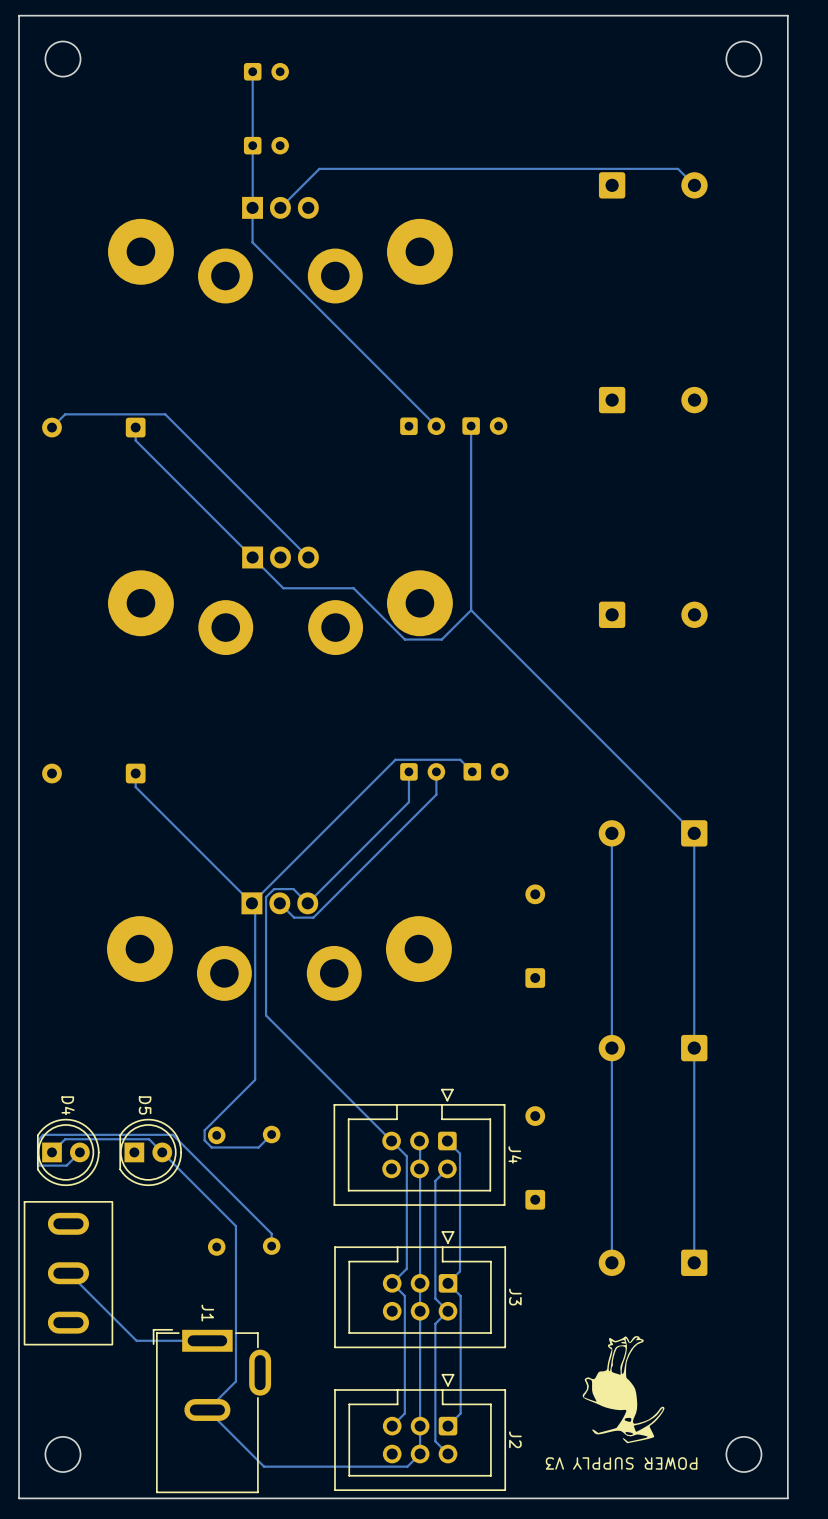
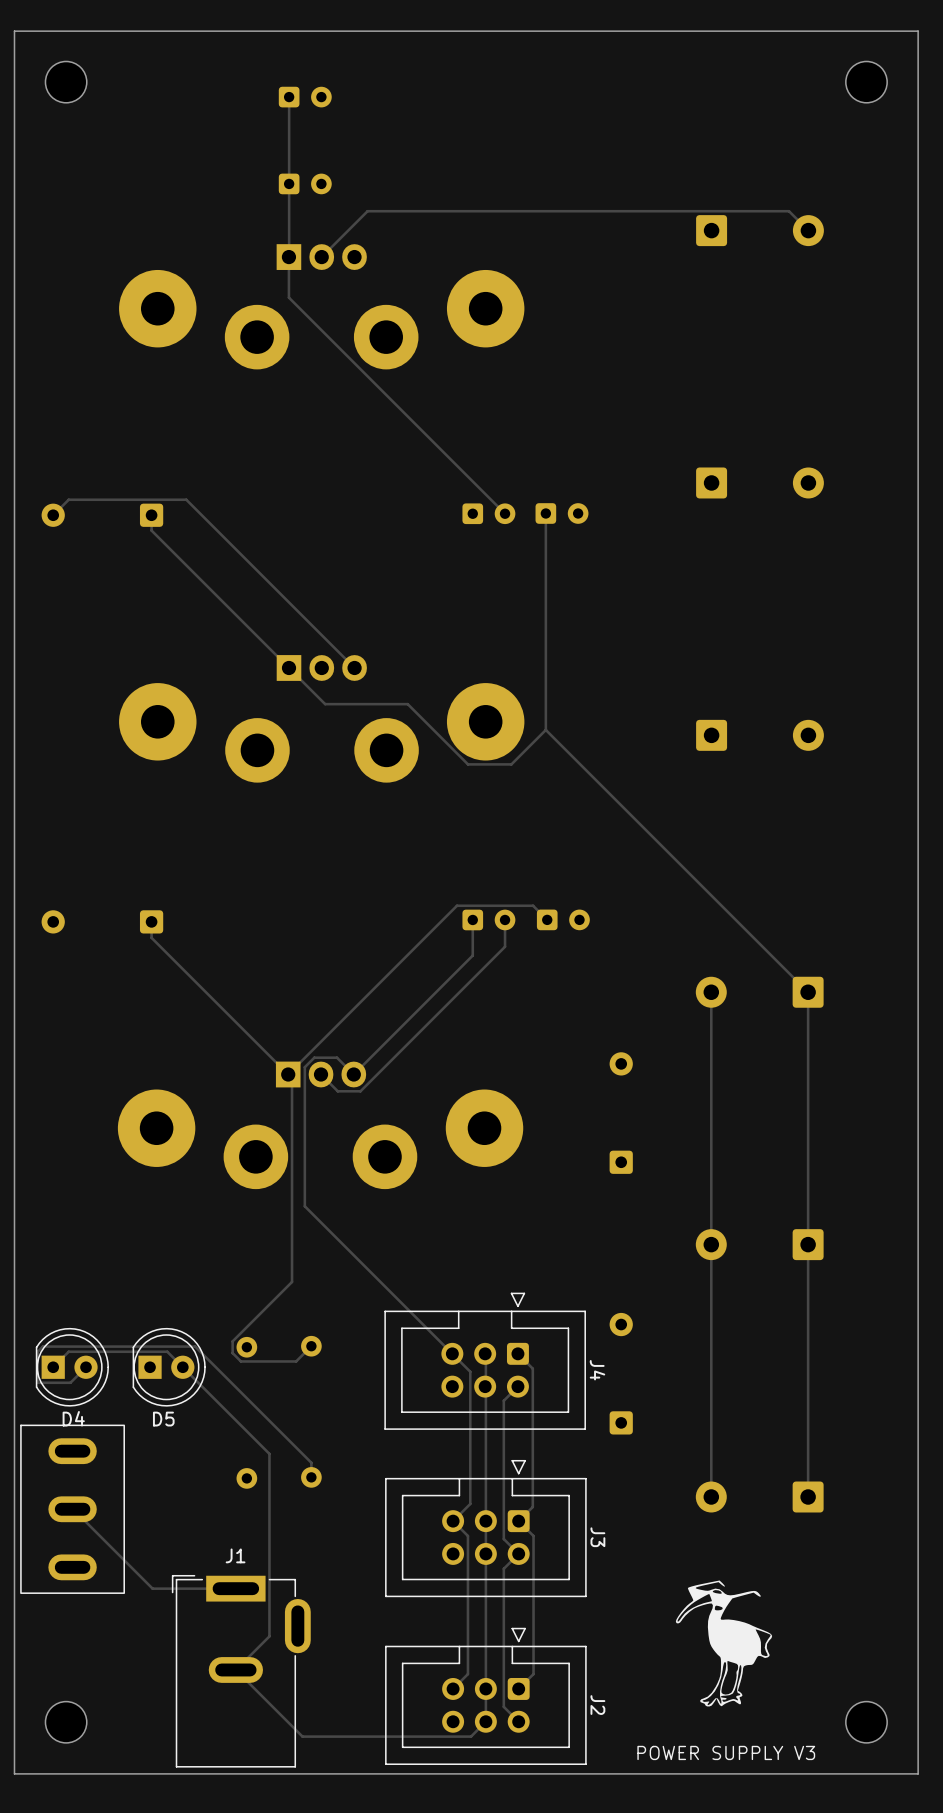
D4 name rotation: 0° (68, 1105) -> 90° counterclockwise (73, 1418)
D4 name position: D4 (68, 1105) -> D4 (73, 1418)
D5 name rotation: 0° (145, 1105) -> 90° counterclockwise (163, 1419)
D5 name position: D5 (145, 1105) -> D5 (163, 1419)
J1 name rotation: 0° (207, 1313) -> 90° counterclockwise (235, 1555)
drawing shape: [582, 1336, 665, 1444] -> [675, 1580, 773, 1707]
text rotation: 0° (621, 1463) -> 180° (726, 1752)

